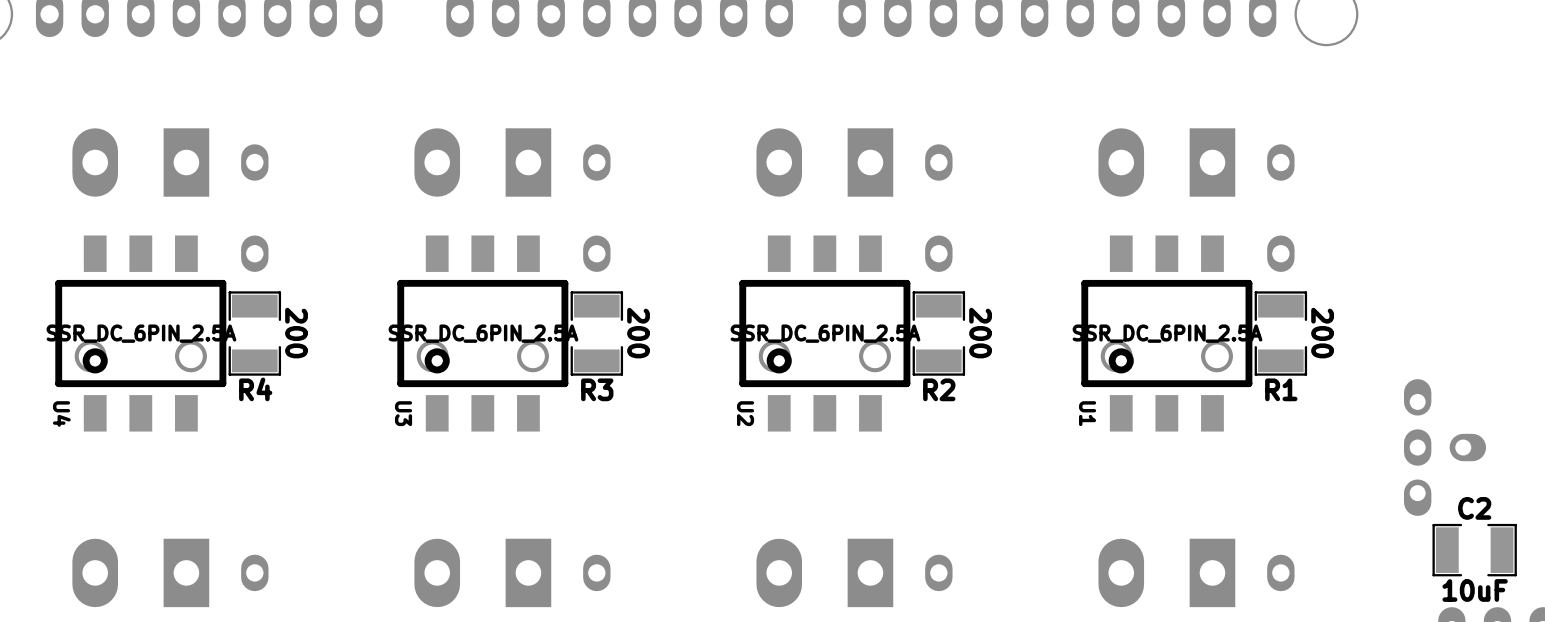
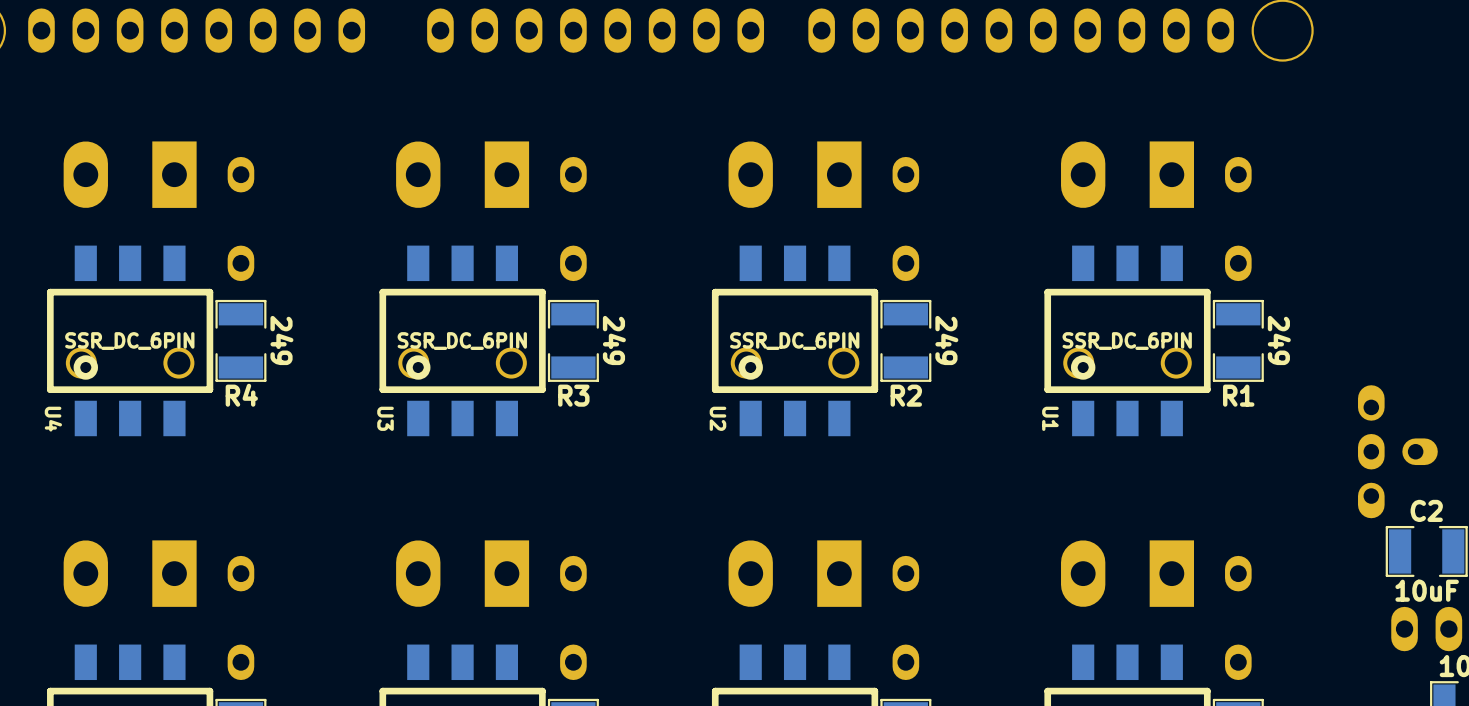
U4 value: SSR_DC_6PIN_2.5A (141, 333) -> SSR_DC_6PIN (129, 341)
R4 value: 200 (296, 333) -> 249 (281, 340)
U3 value: SSR_DC_6PIN_2.5A (483, 333) -> SSR_DC_6PIN (462, 341)
R3 value: 200 (638, 333) -> 249 (614, 340)
U2 value: SSR_DC_6PIN_2.5A (825, 333) -> SSR_DC_6PIN (794, 341)
R2 value: 200 (980, 333) -> 249 (946, 340)
U1 value: SSR_DC_6PIN_2.5A (1167, 333) -> SSR_DC_6PIN (1127, 341)
R1 value: 200 (1322, 333) -> 249 (1279, 340)

